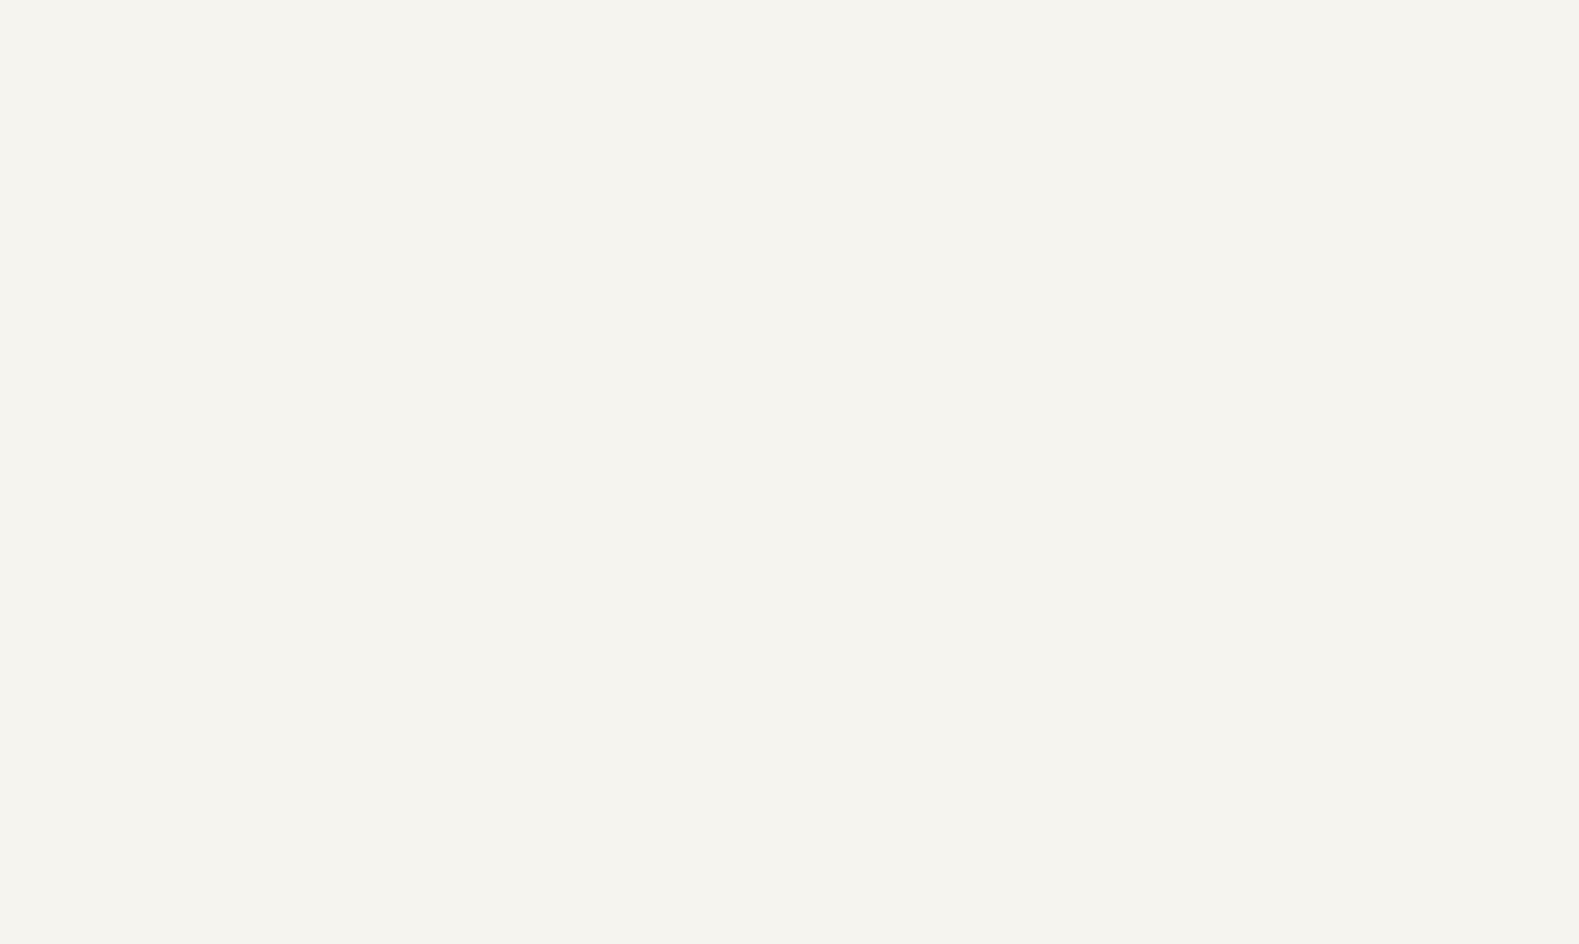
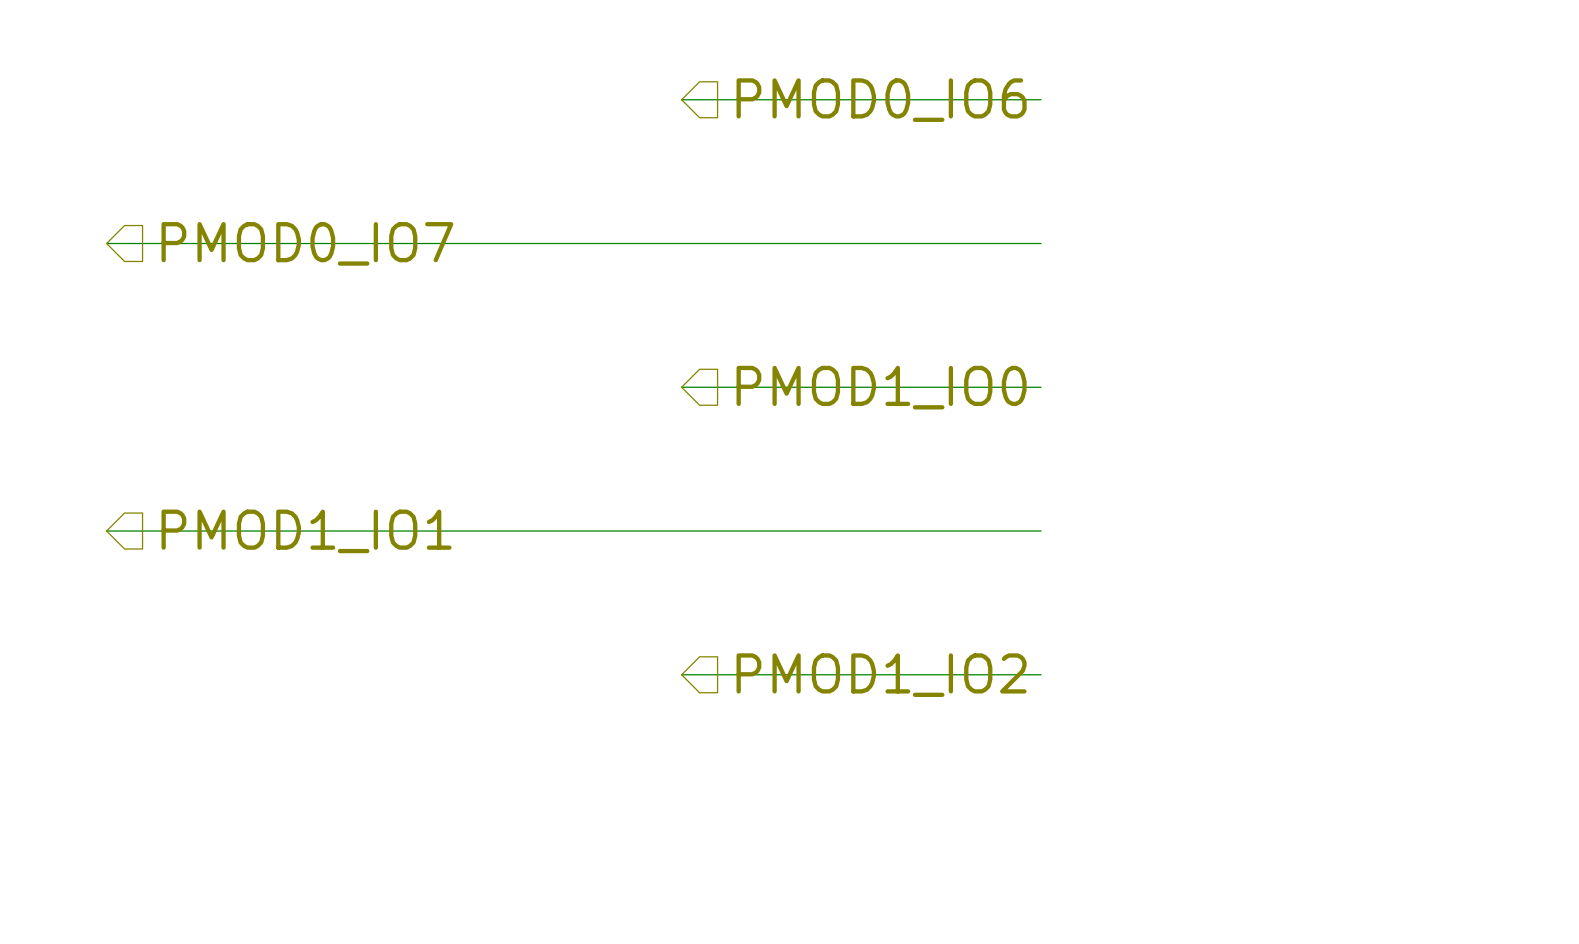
wire: none -> (681, 99) (1041, 99)
hierarchical label: none -> PMOD0_IO6 (881, 100)
wire: none -> (106, 243) (1041, 243)
hierarchical label: none -> PMOD0_IO7 (307, 243)
wire: none -> (681, 387) (1041, 387)
hierarchical label: none -> PMOD1_IO0 (881, 387)
wire: none -> (106, 531) (1041, 531)
hierarchical label: none -> PMOD1_IO1 (306, 531)
wire: none -> (681, 674) (1041, 674)
hierarchical label: none -> PMOD1_IO2 (881, 675)

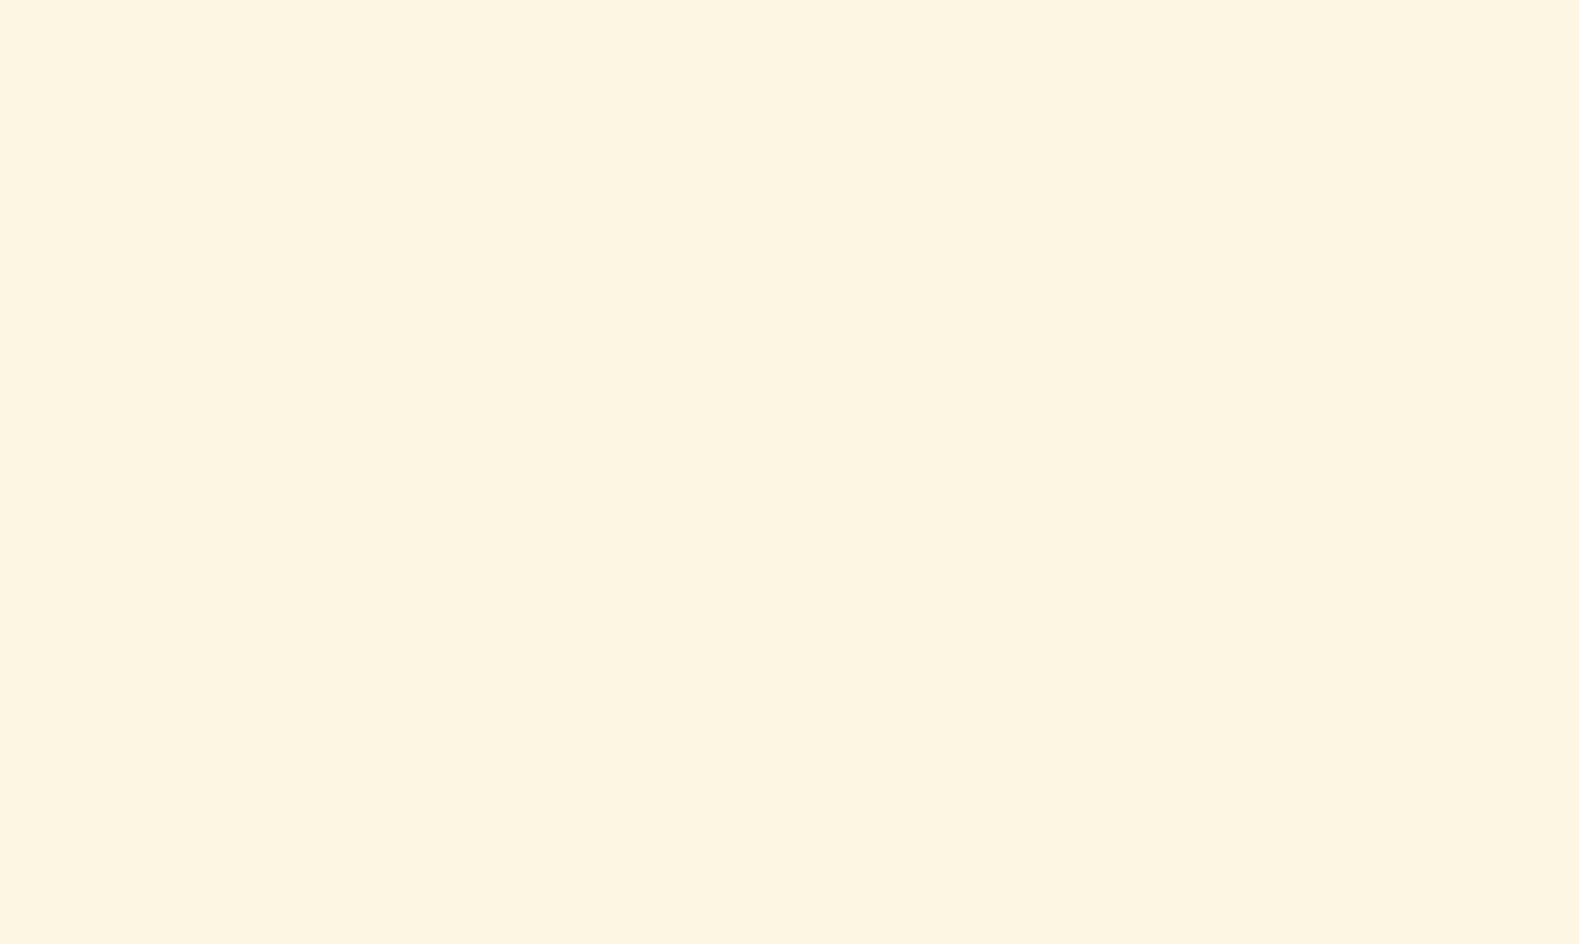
wire: (681, 99) (1041, 99) -> none
hierarchical label: PMOD0_IO6 (881, 100) -> none
wire: (106, 243) (1041, 243) -> none
hierarchical label: PMOD0_IO7 (307, 243) -> none
wire: (681, 387) (1041, 387) -> none
hierarchical label: PMOD1_IO0 (881, 387) -> none
wire: (106, 531) (1041, 531) -> none
hierarchical label: PMOD1_IO1 (306, 531) -> none
wire: (681, 674) (1041, 674) -> none
hierarchical label: PMOD1_IO2 (881, 675) -> none

